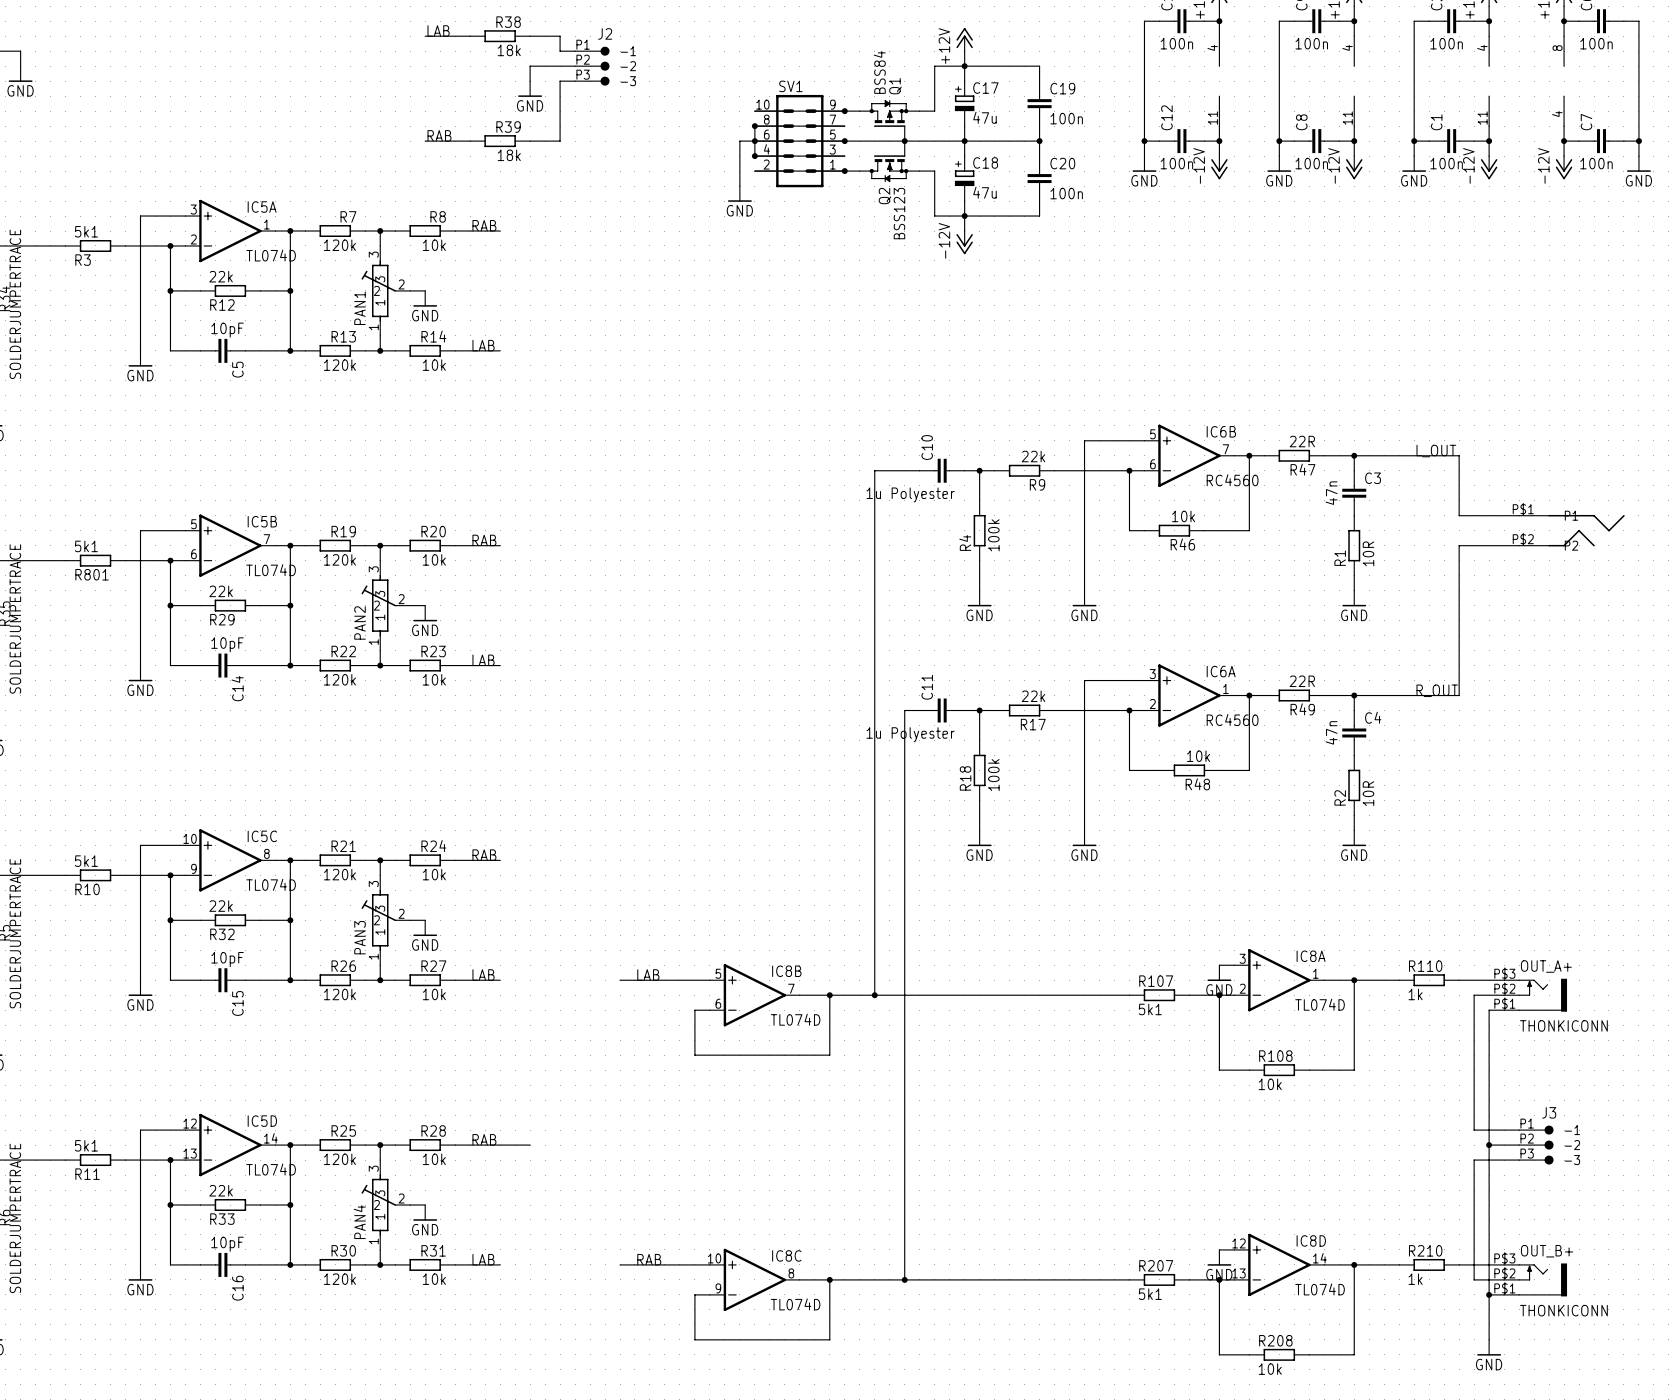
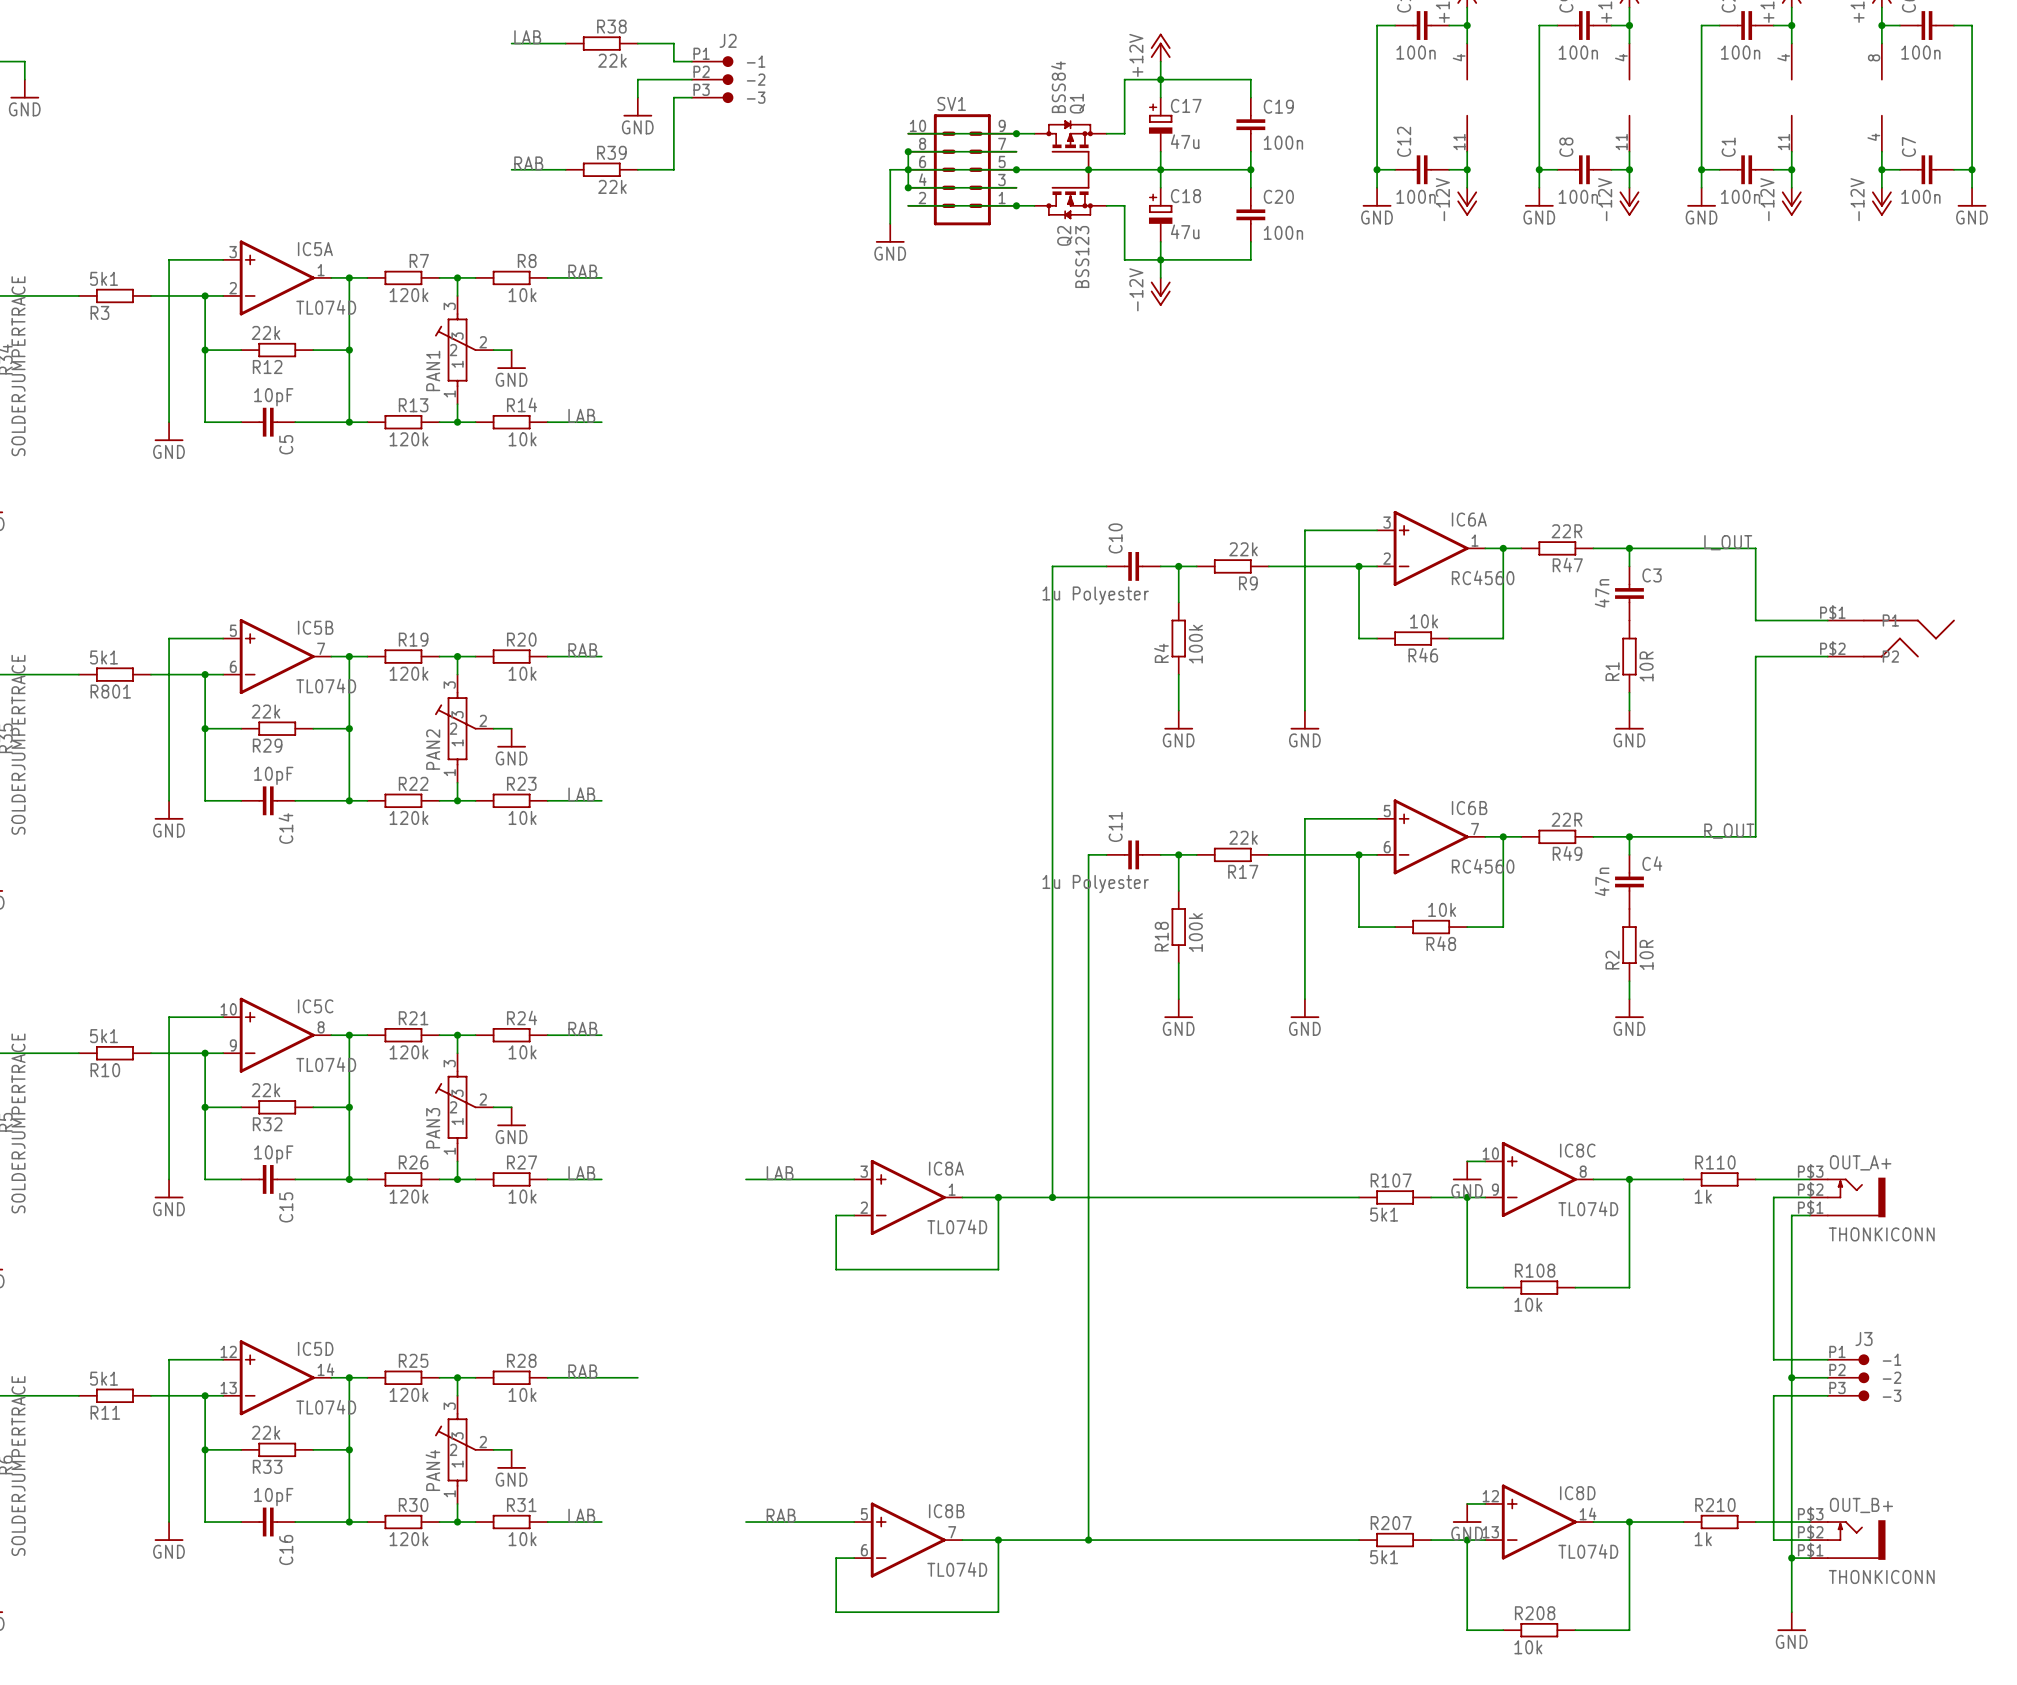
R38 value: 18k (509, 50) -> 22k (612, 60)
R39 value: 18k (509, 155) -> 22k (612, 186)
IC6B position: (1189, 455) -> (1431, 836)
IC6A position: (1189, 695) -> (1431, 548)
IC8A position: (1279, 980) -> (908, 1197)
IC8B position: (754, 995) -> (908, 1540)
IC8C position: (754, 1279) -> (1539, 1179)

